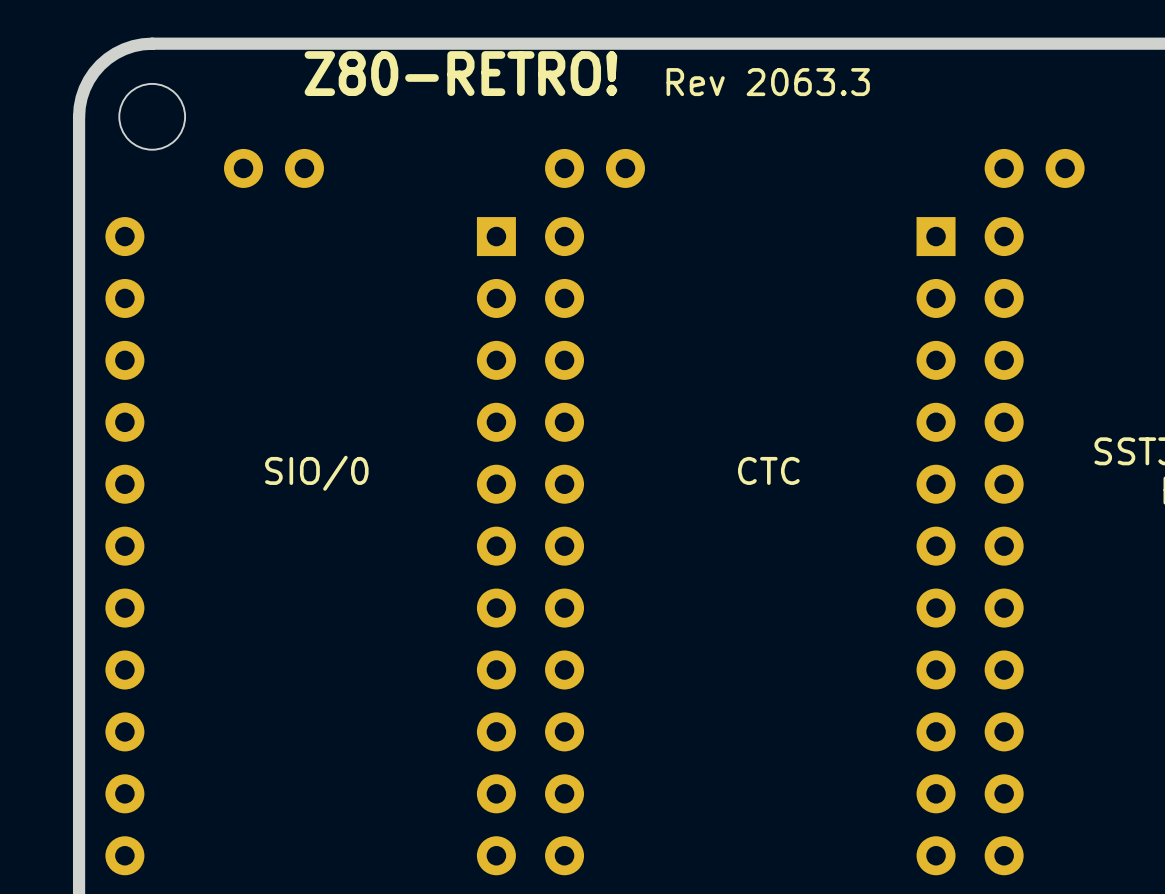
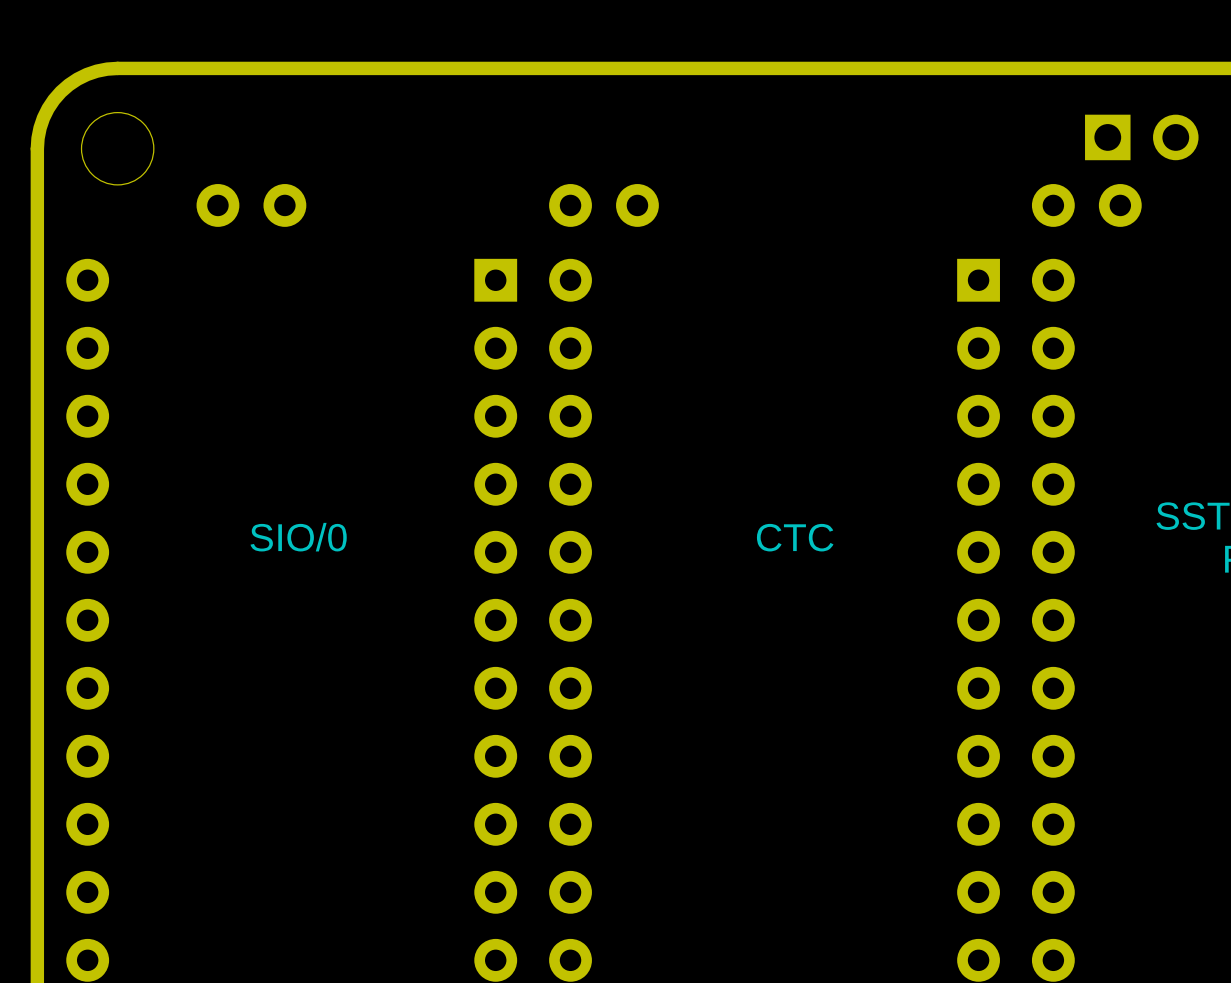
text: Z80-RETRO! (460, 73) -> none
text: Rev 2063.3 (768, 82) -> none
part: none -> (1141, 137)

